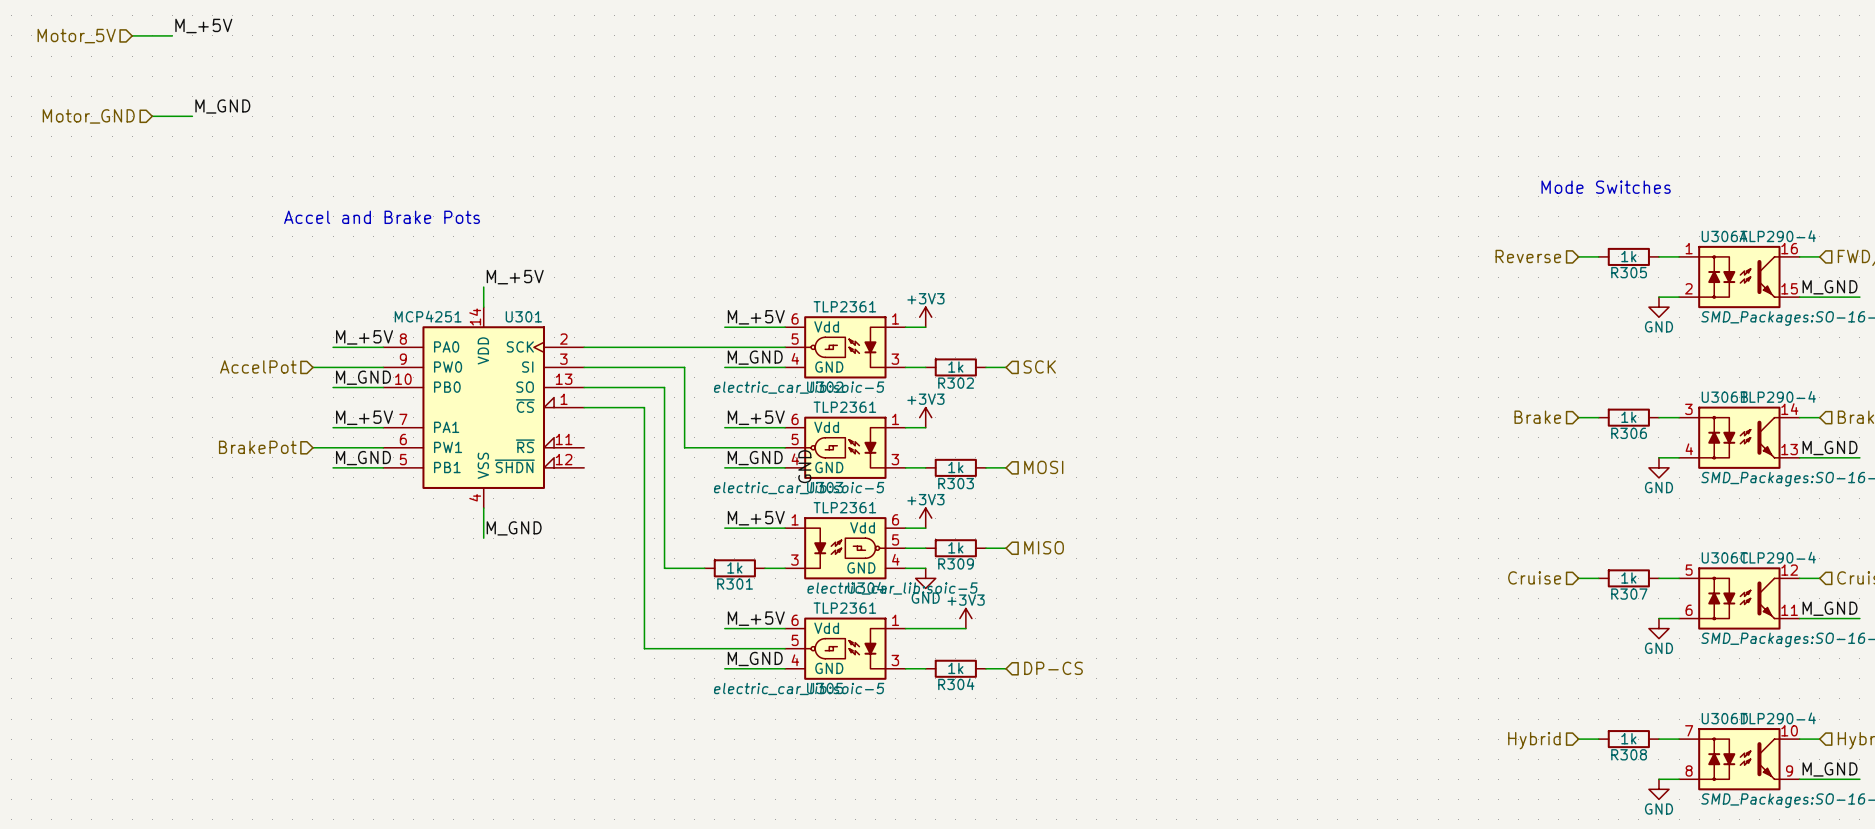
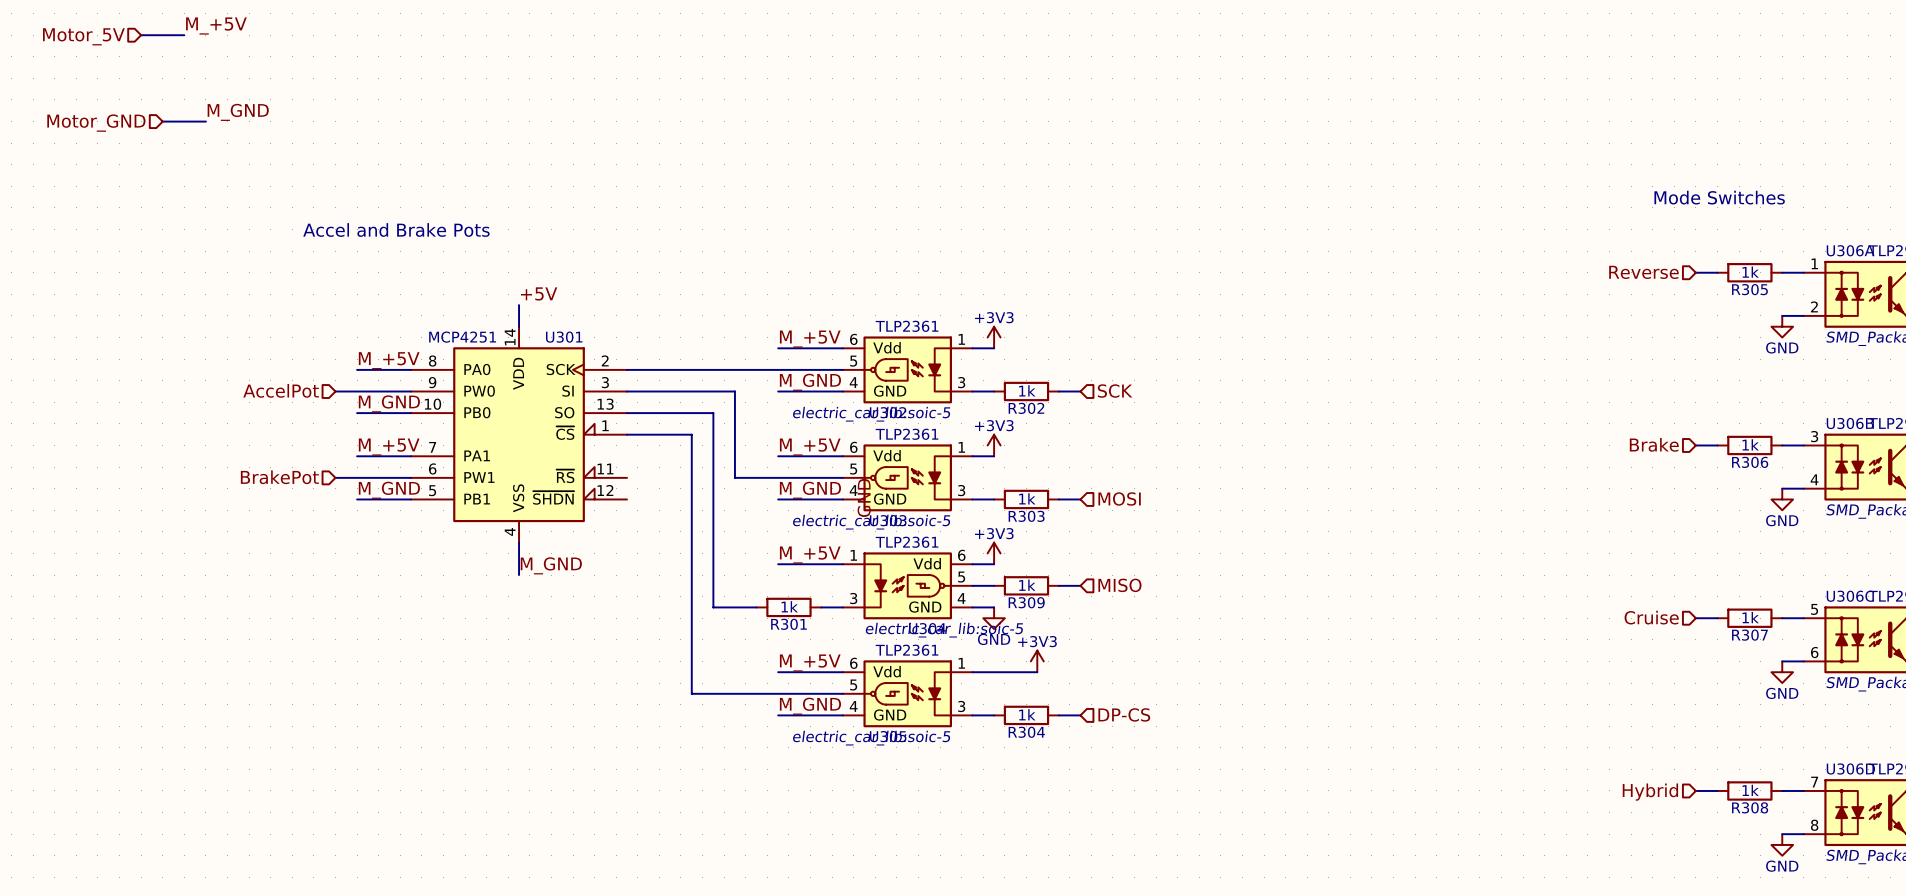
label: M_+5V (515, 277) -> +5V (539, 293)

